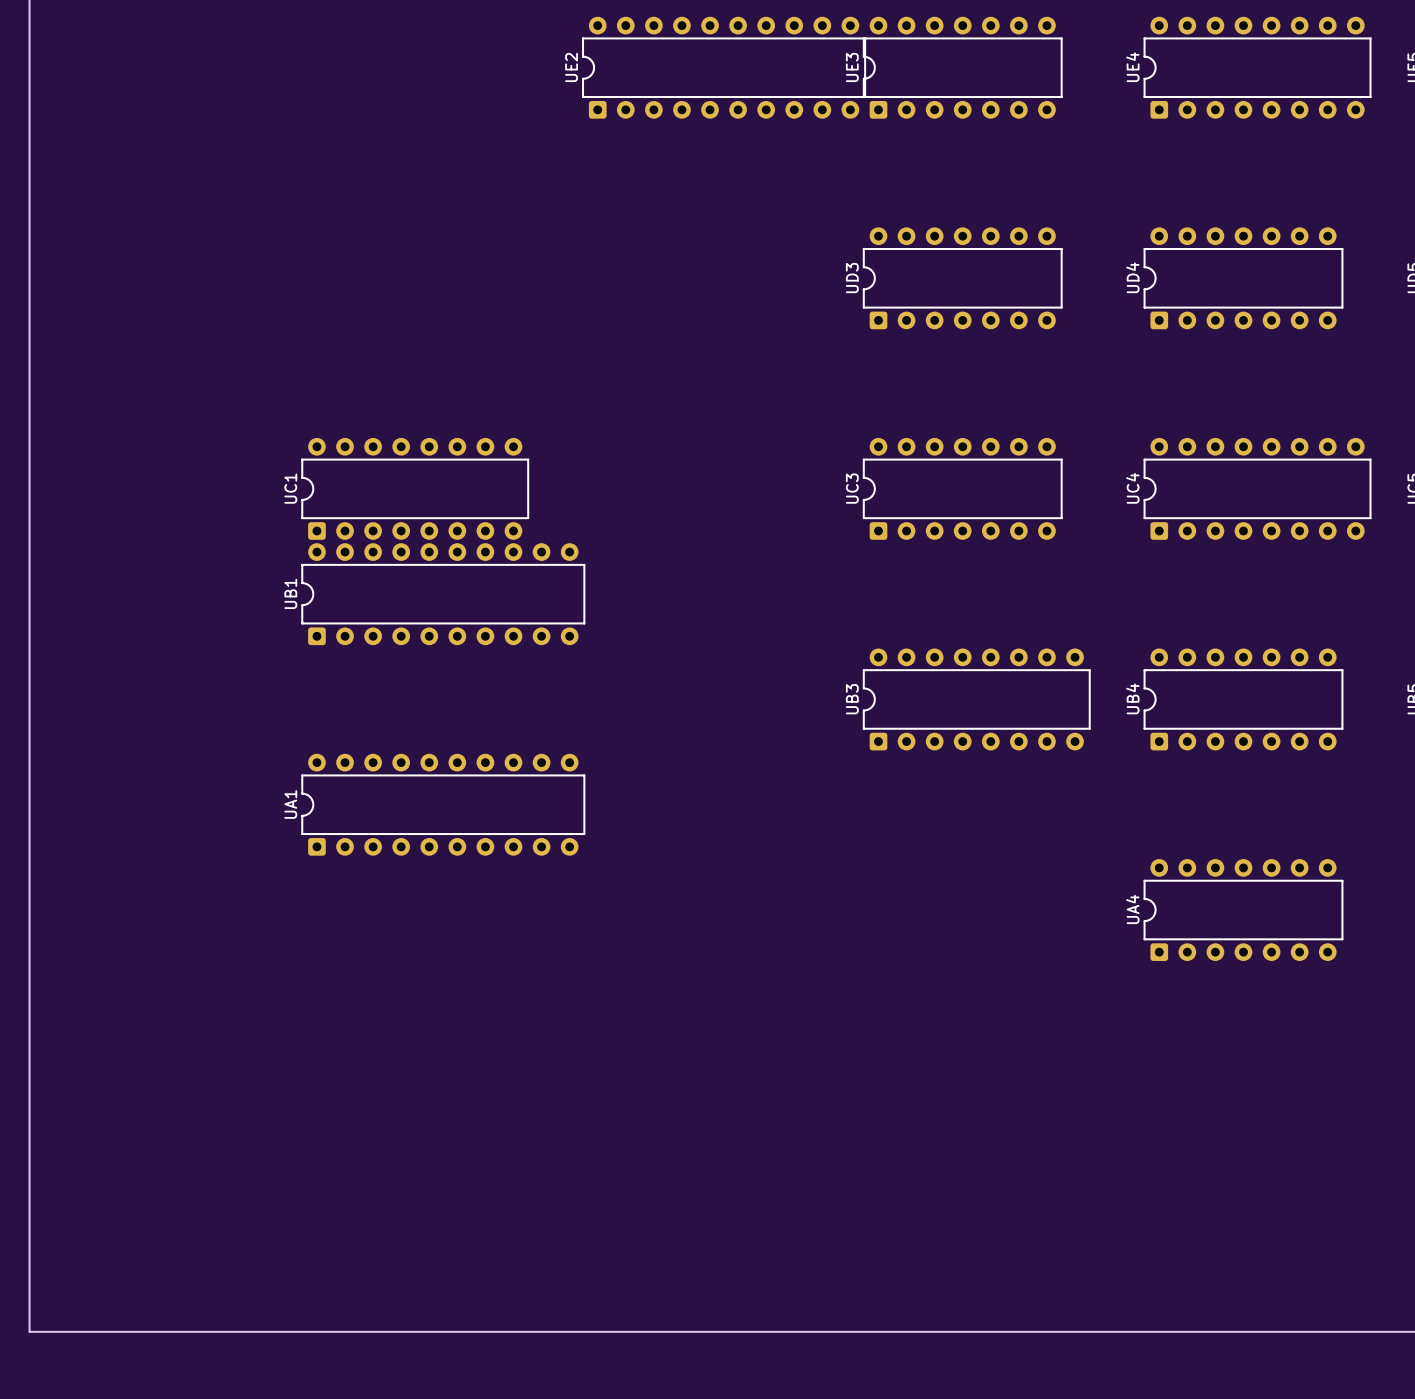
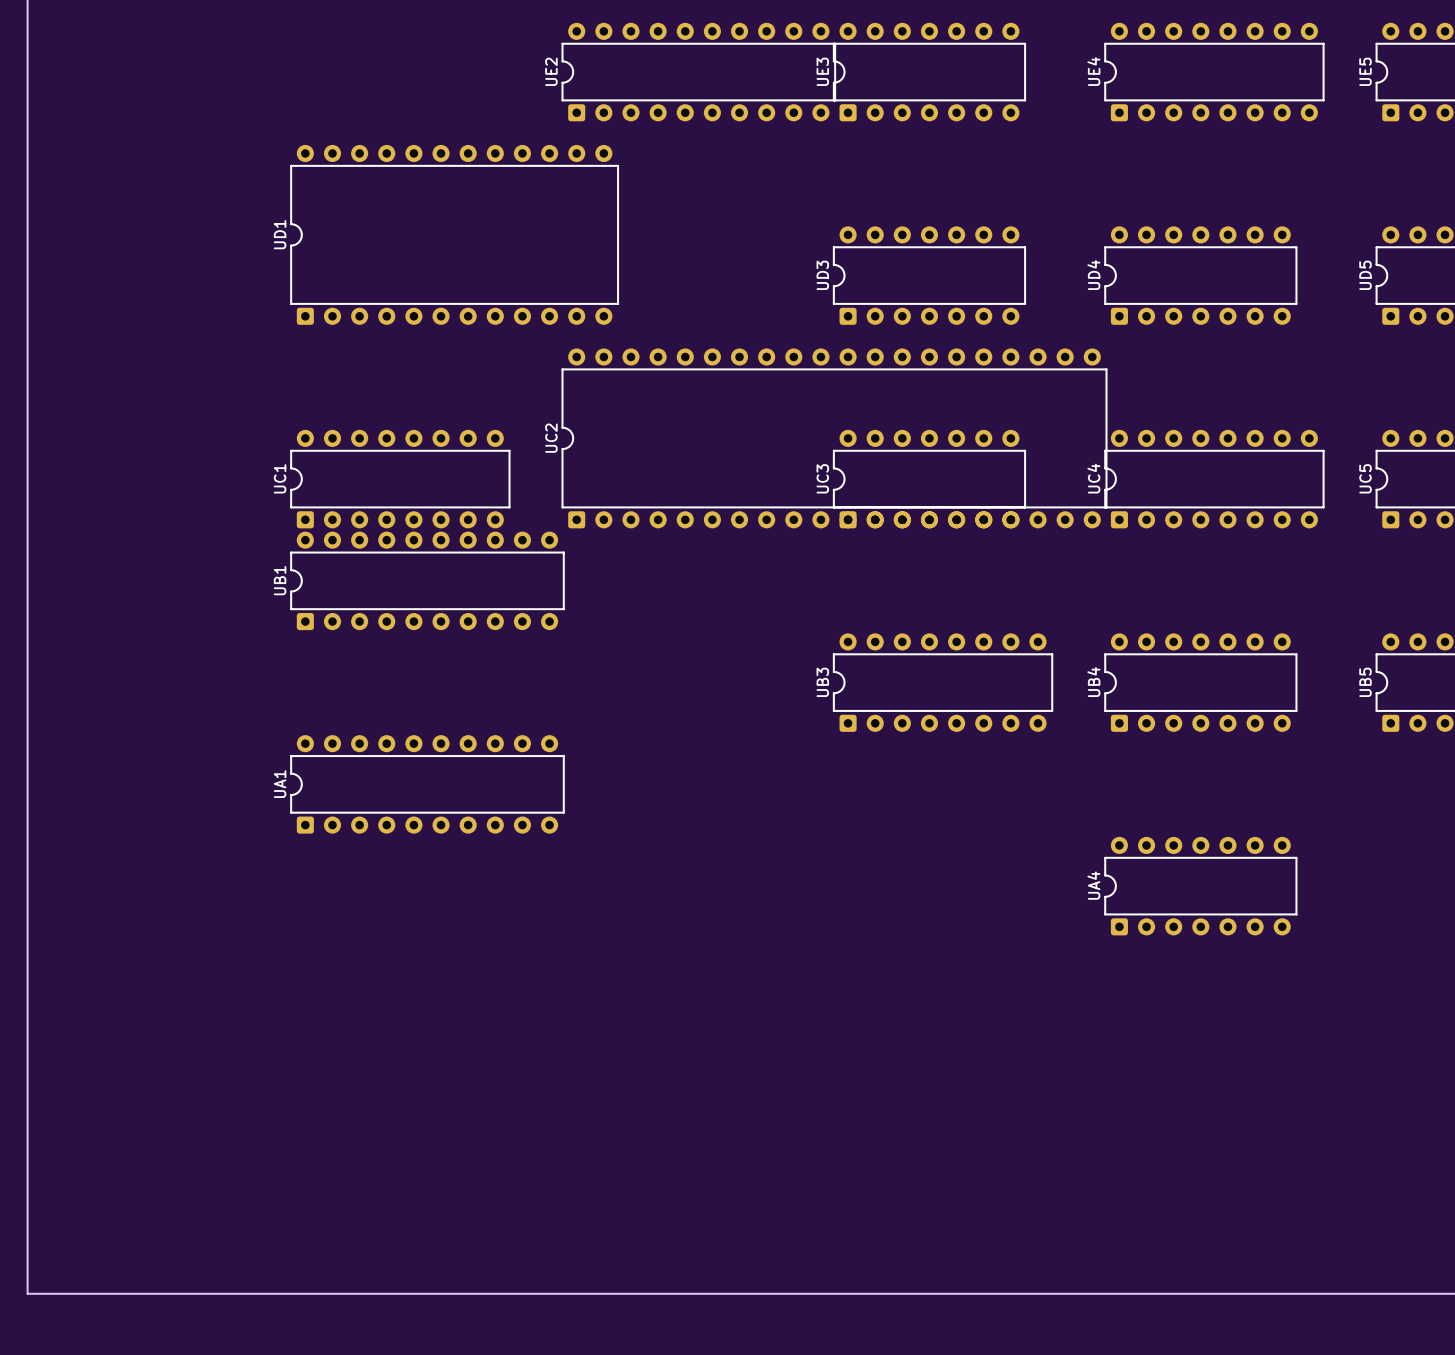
UD1: none -> (454, 234)
UC2: none -> (834, 438)

